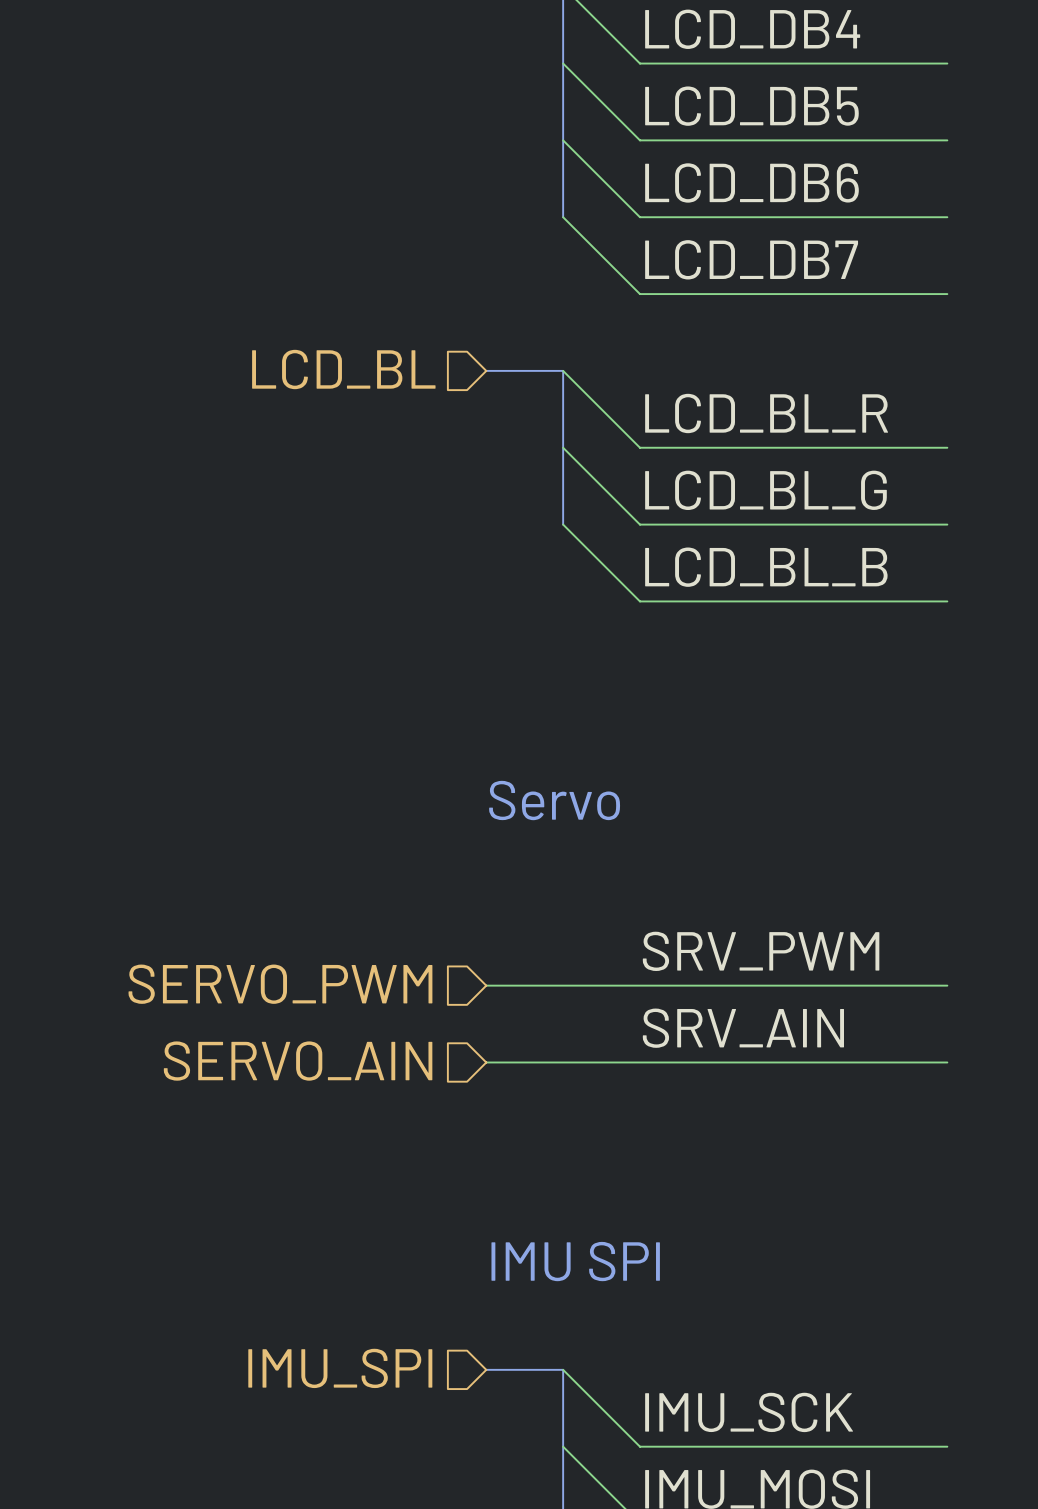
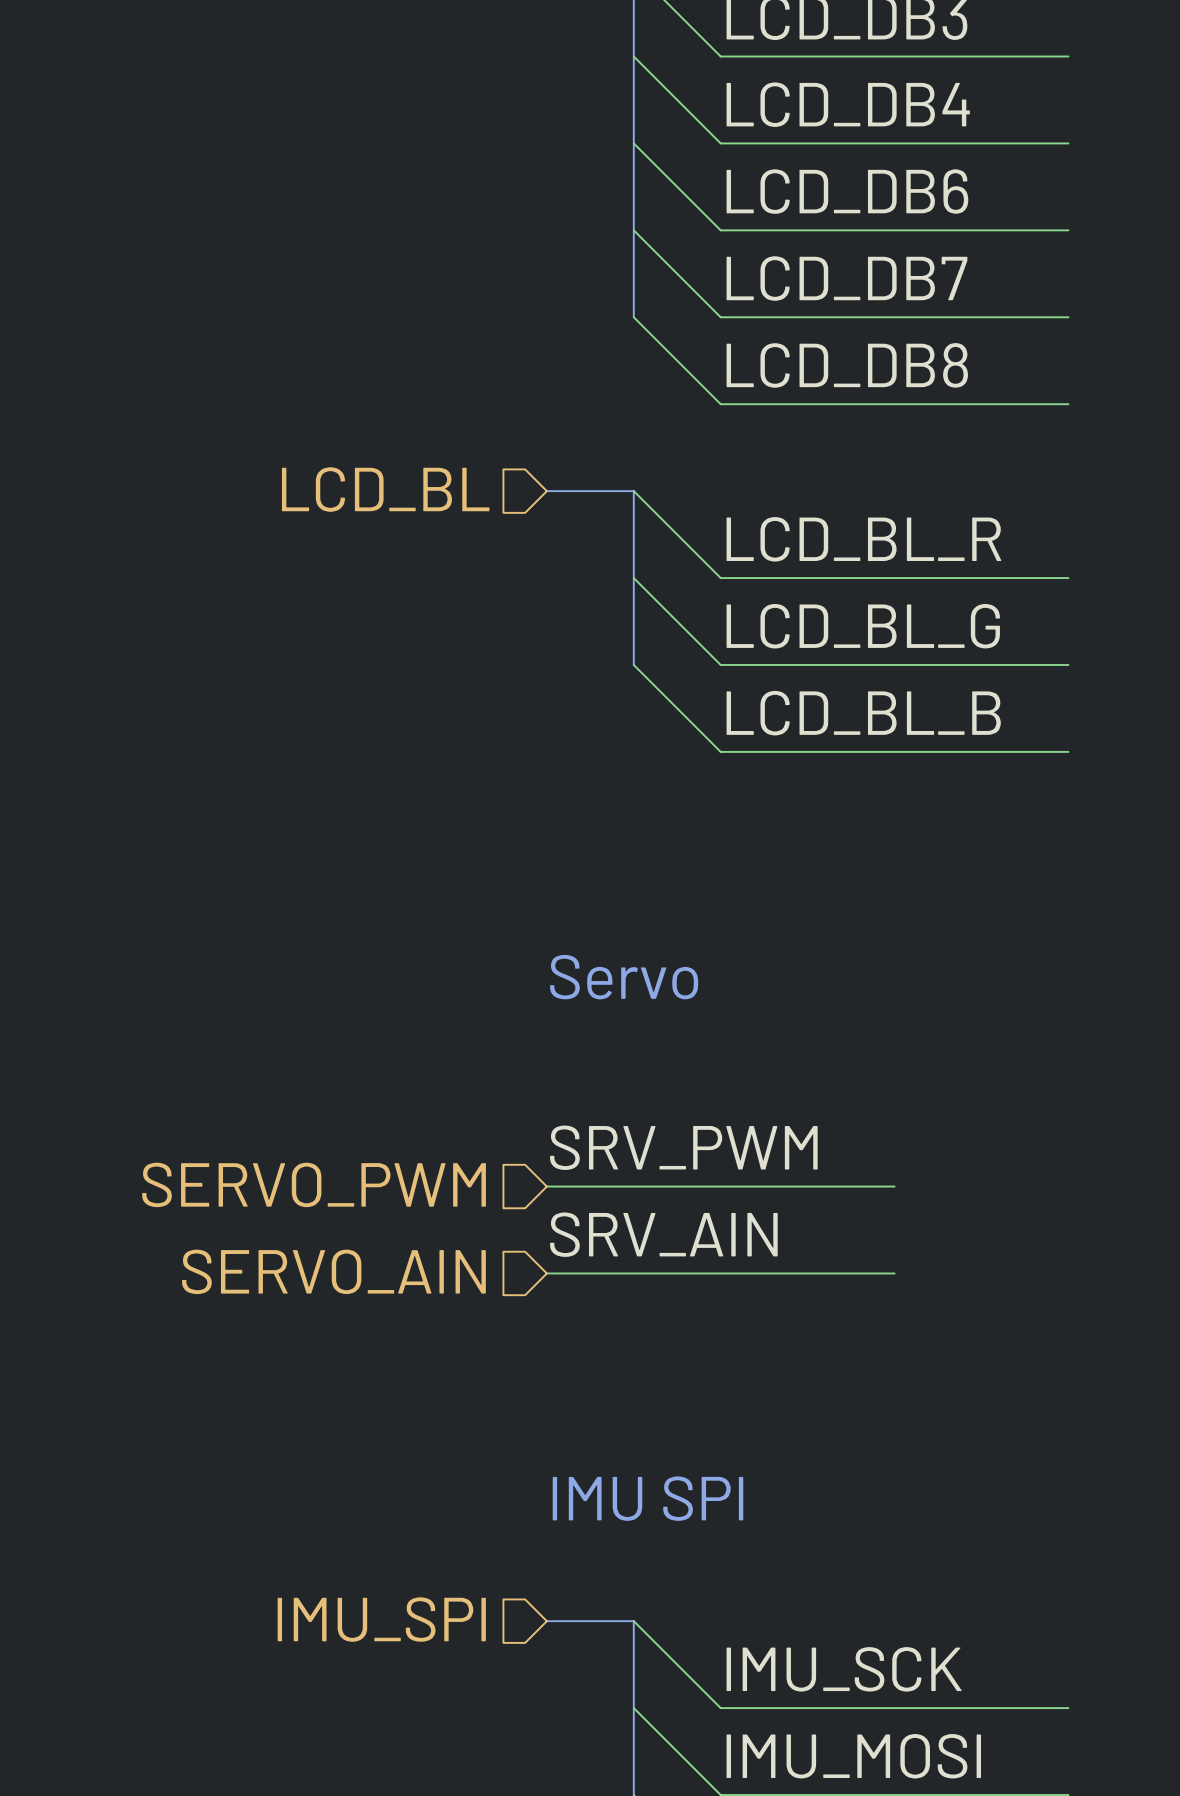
label: LCD_DB5 (751, 106) -> LCD_DB6 (847, 191)
label: LCD_DB6 (751, 182) -> LCD_DB7 (846, 278)
label: LCD_DB7 (751, 259) -> LCD_DB8 (847, 365)
label position: SRV_PWM (761, 951) -> SRV_PWM (683, 1147)
wire: (793, 985) (947, 985) -> none
label position: SRV_AIN (743, 1028) -> SRV_AIN (663, 1234)
wire: (793, 1062) (947, 1062) -> none

